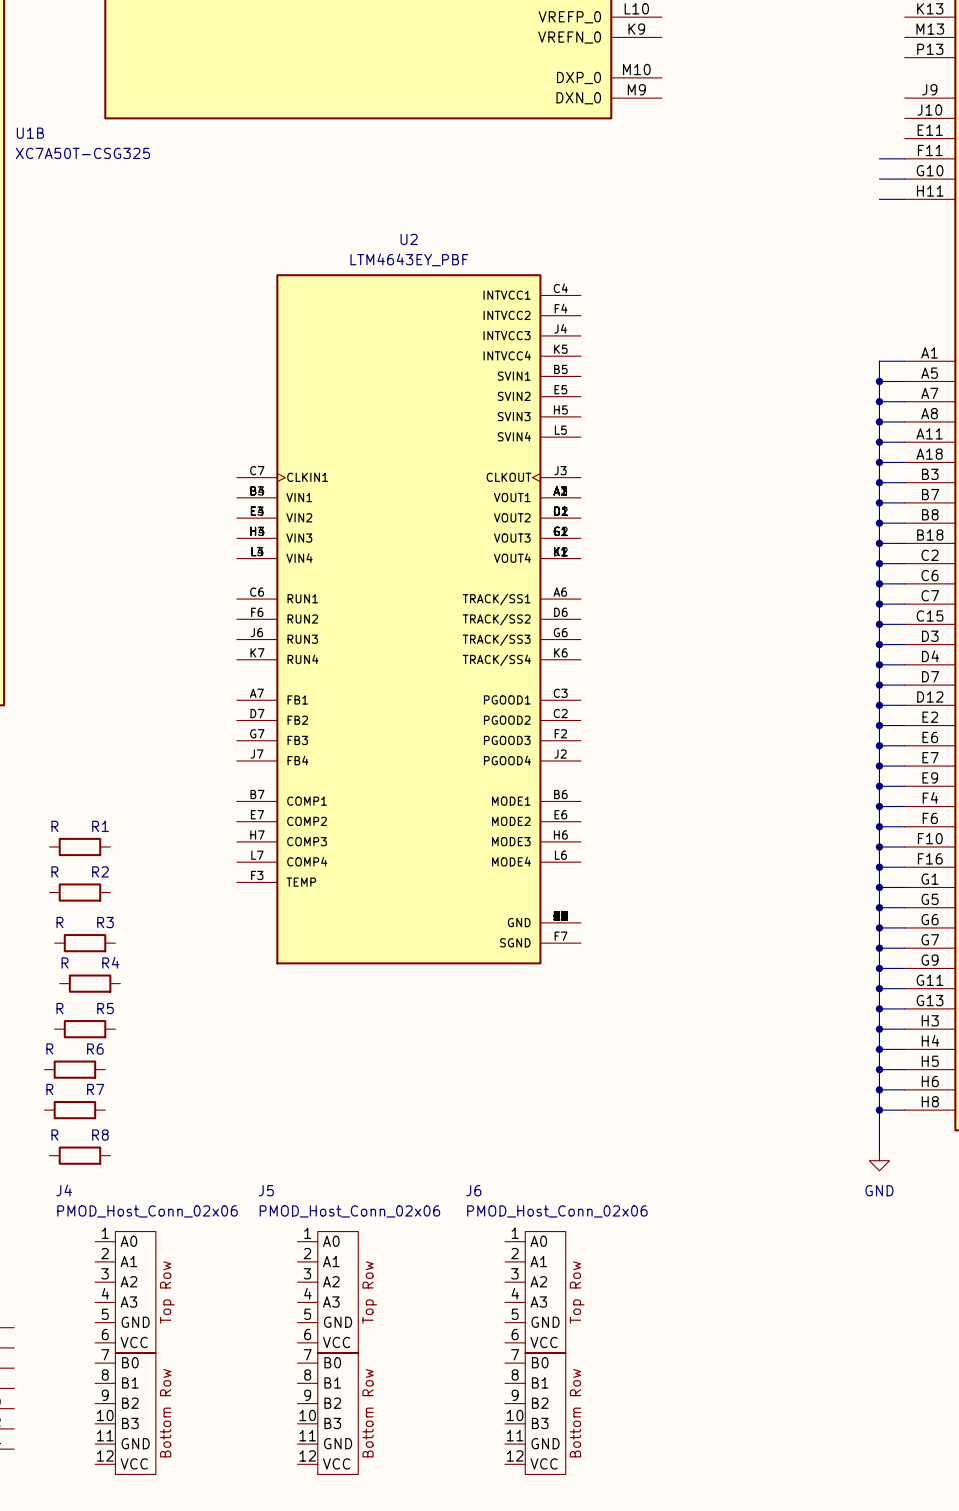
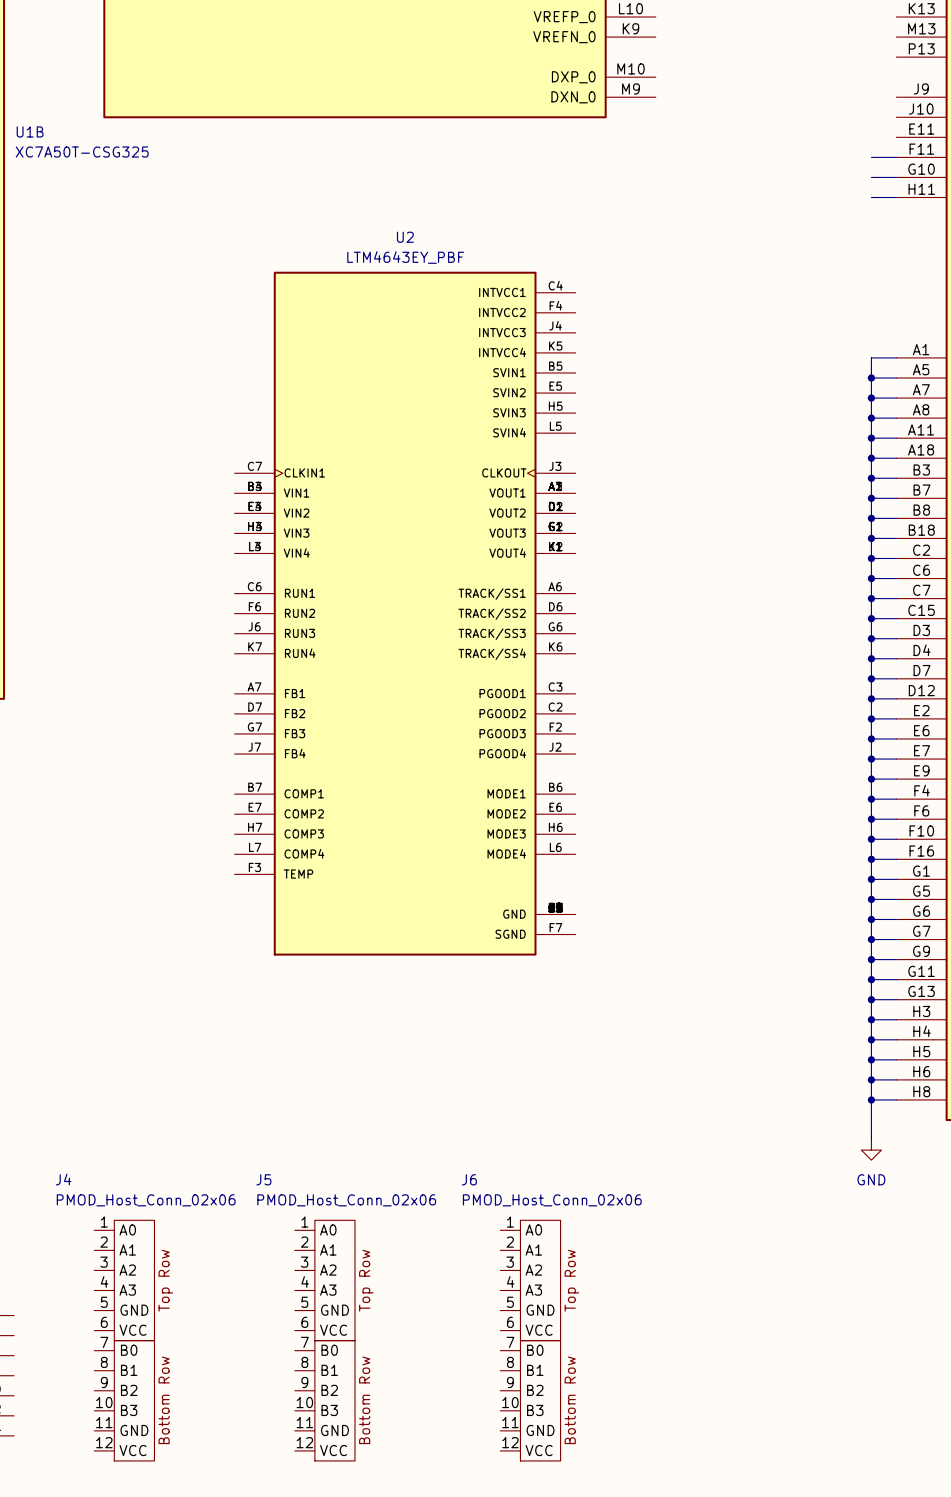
R1: R (79, 847) -> none
R2: R (79, 892) -> none
R3: R (85, 943) -> none
R4: R (90, 983) -> none
R5: R (85, 1029) -> none
R6: R (74, 1069) -> none
R7: R (74, 1110) -> none
R8: R (79, 1155) -> none

